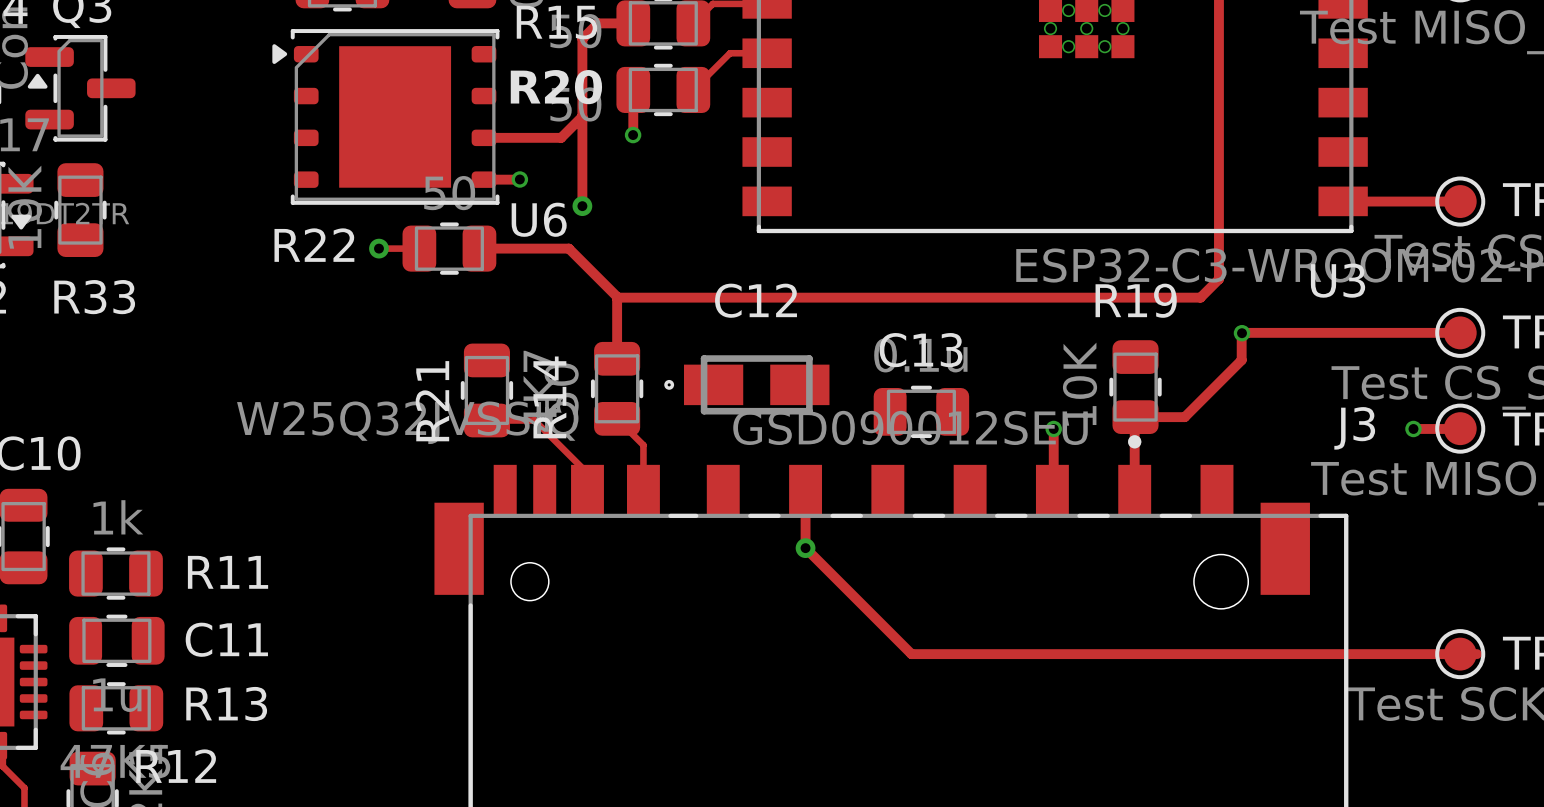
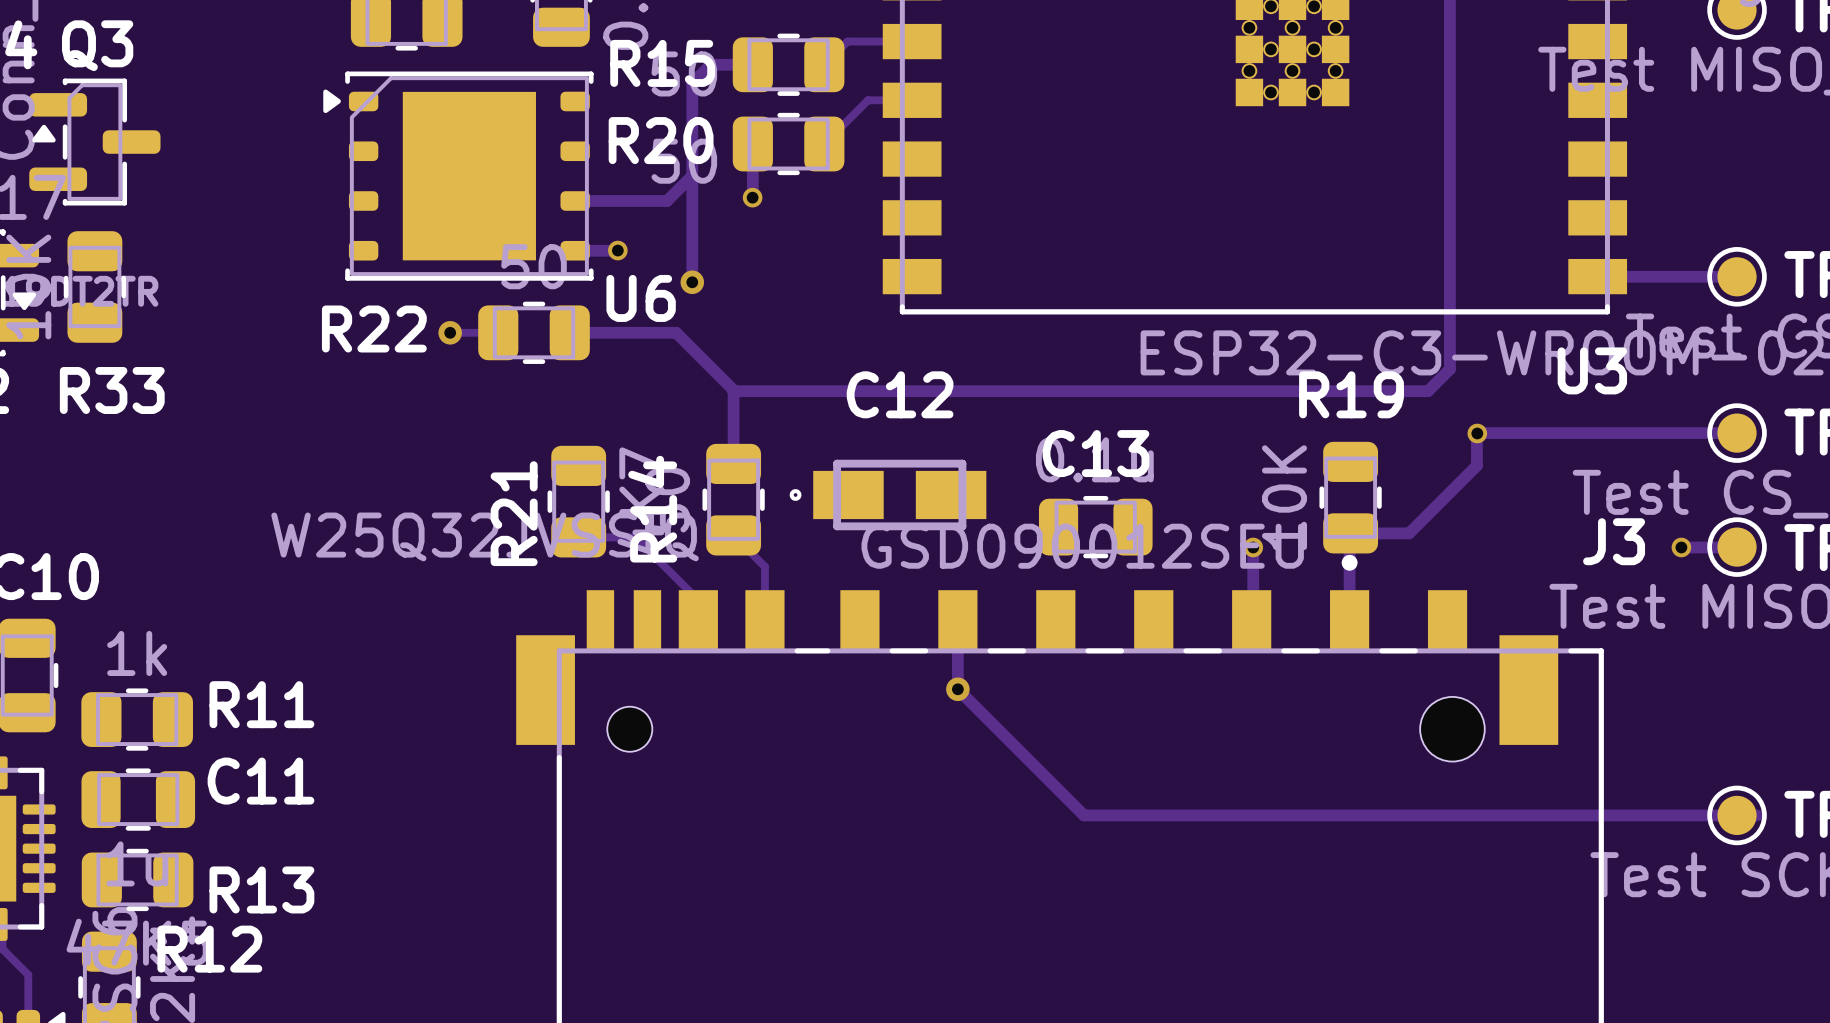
R11 name position: R11 (228, 572) -> R11 (261, 704)
C11 name position: C11 (226, 639) -> C11 (260, 781)
R13 name position: R13 (226, 703) -> R13 (261, 889)

